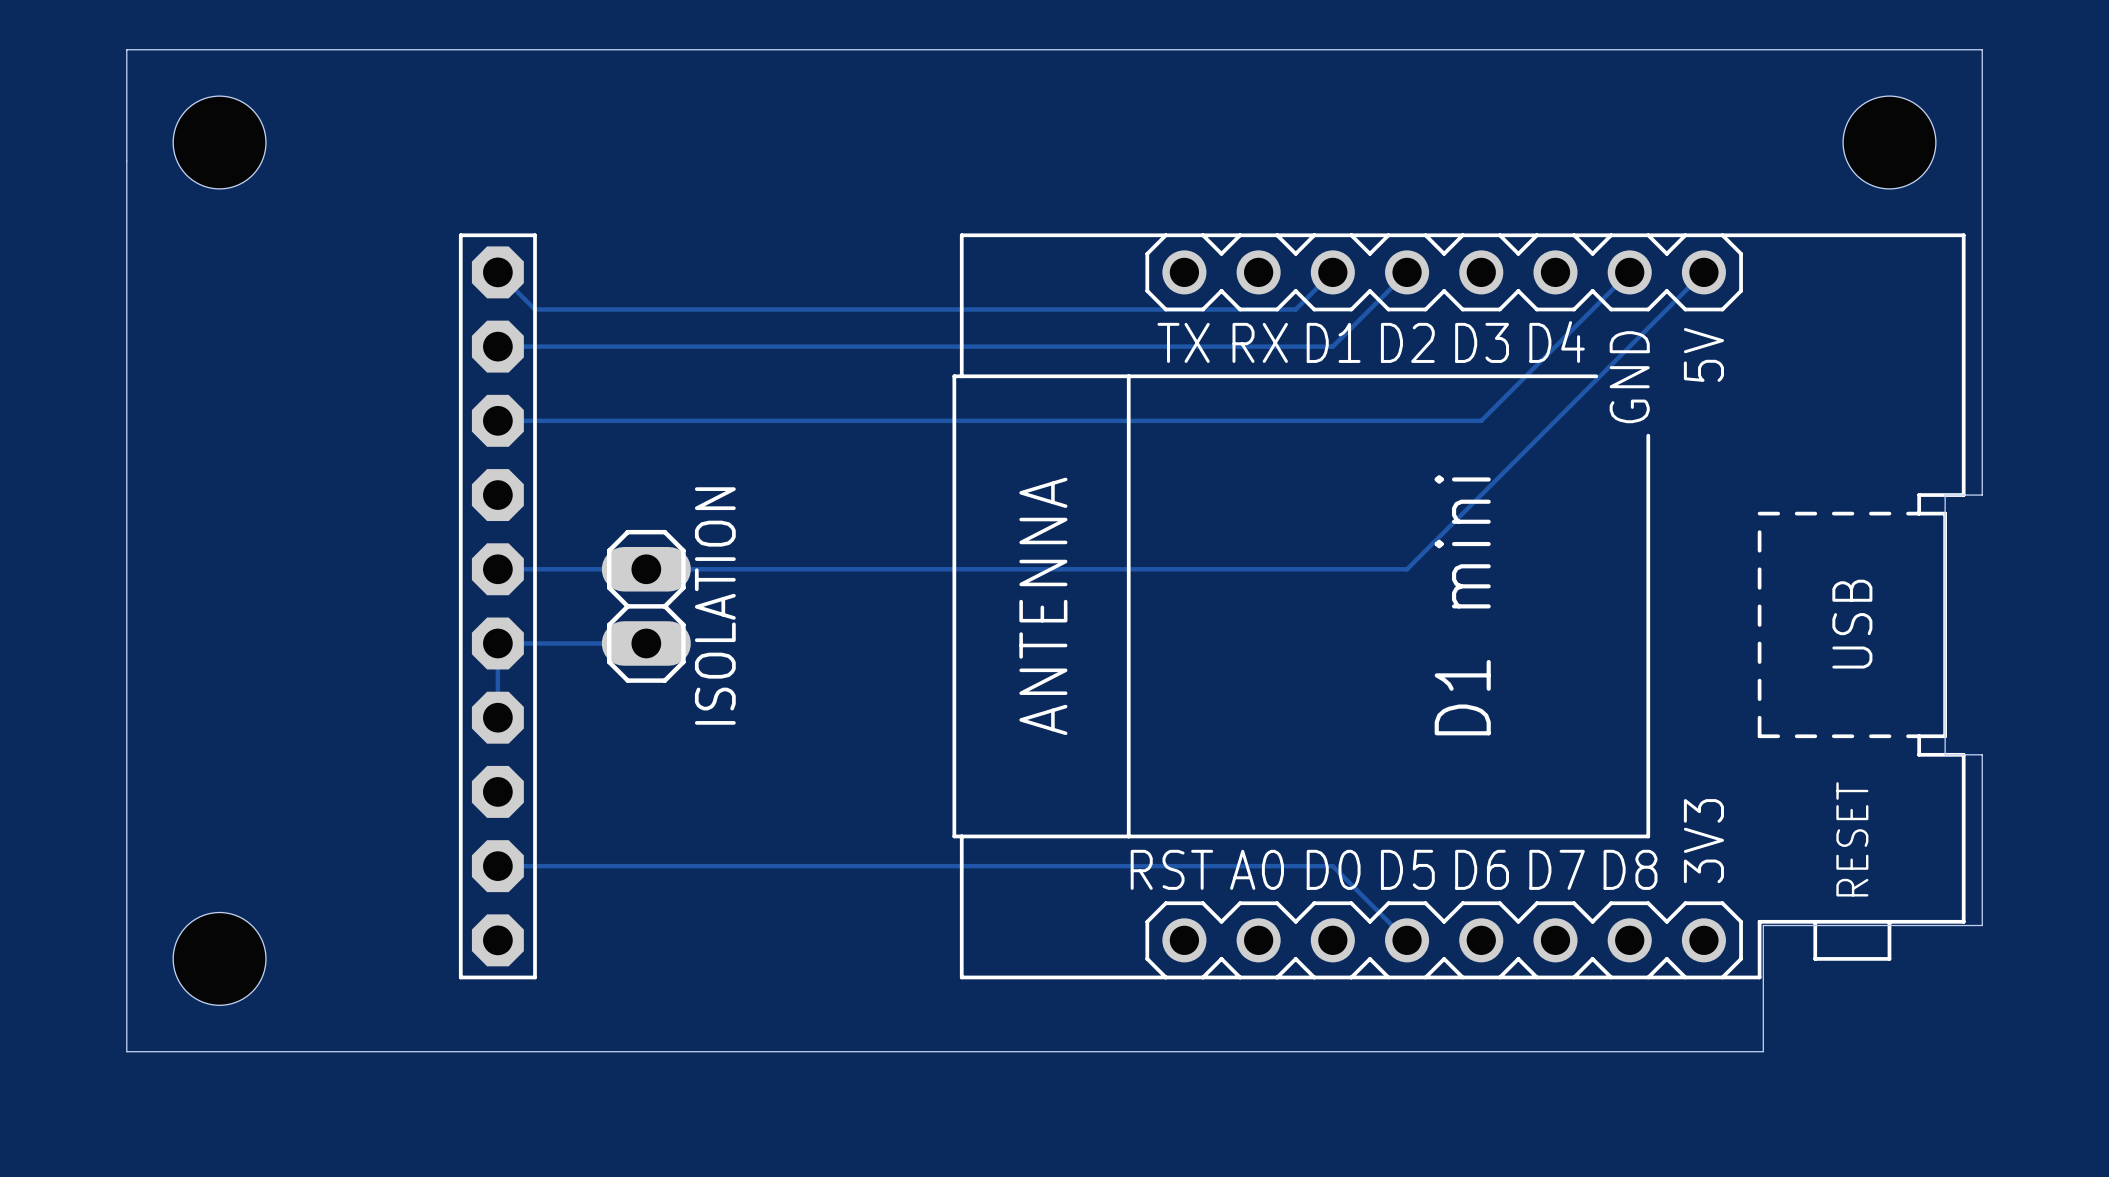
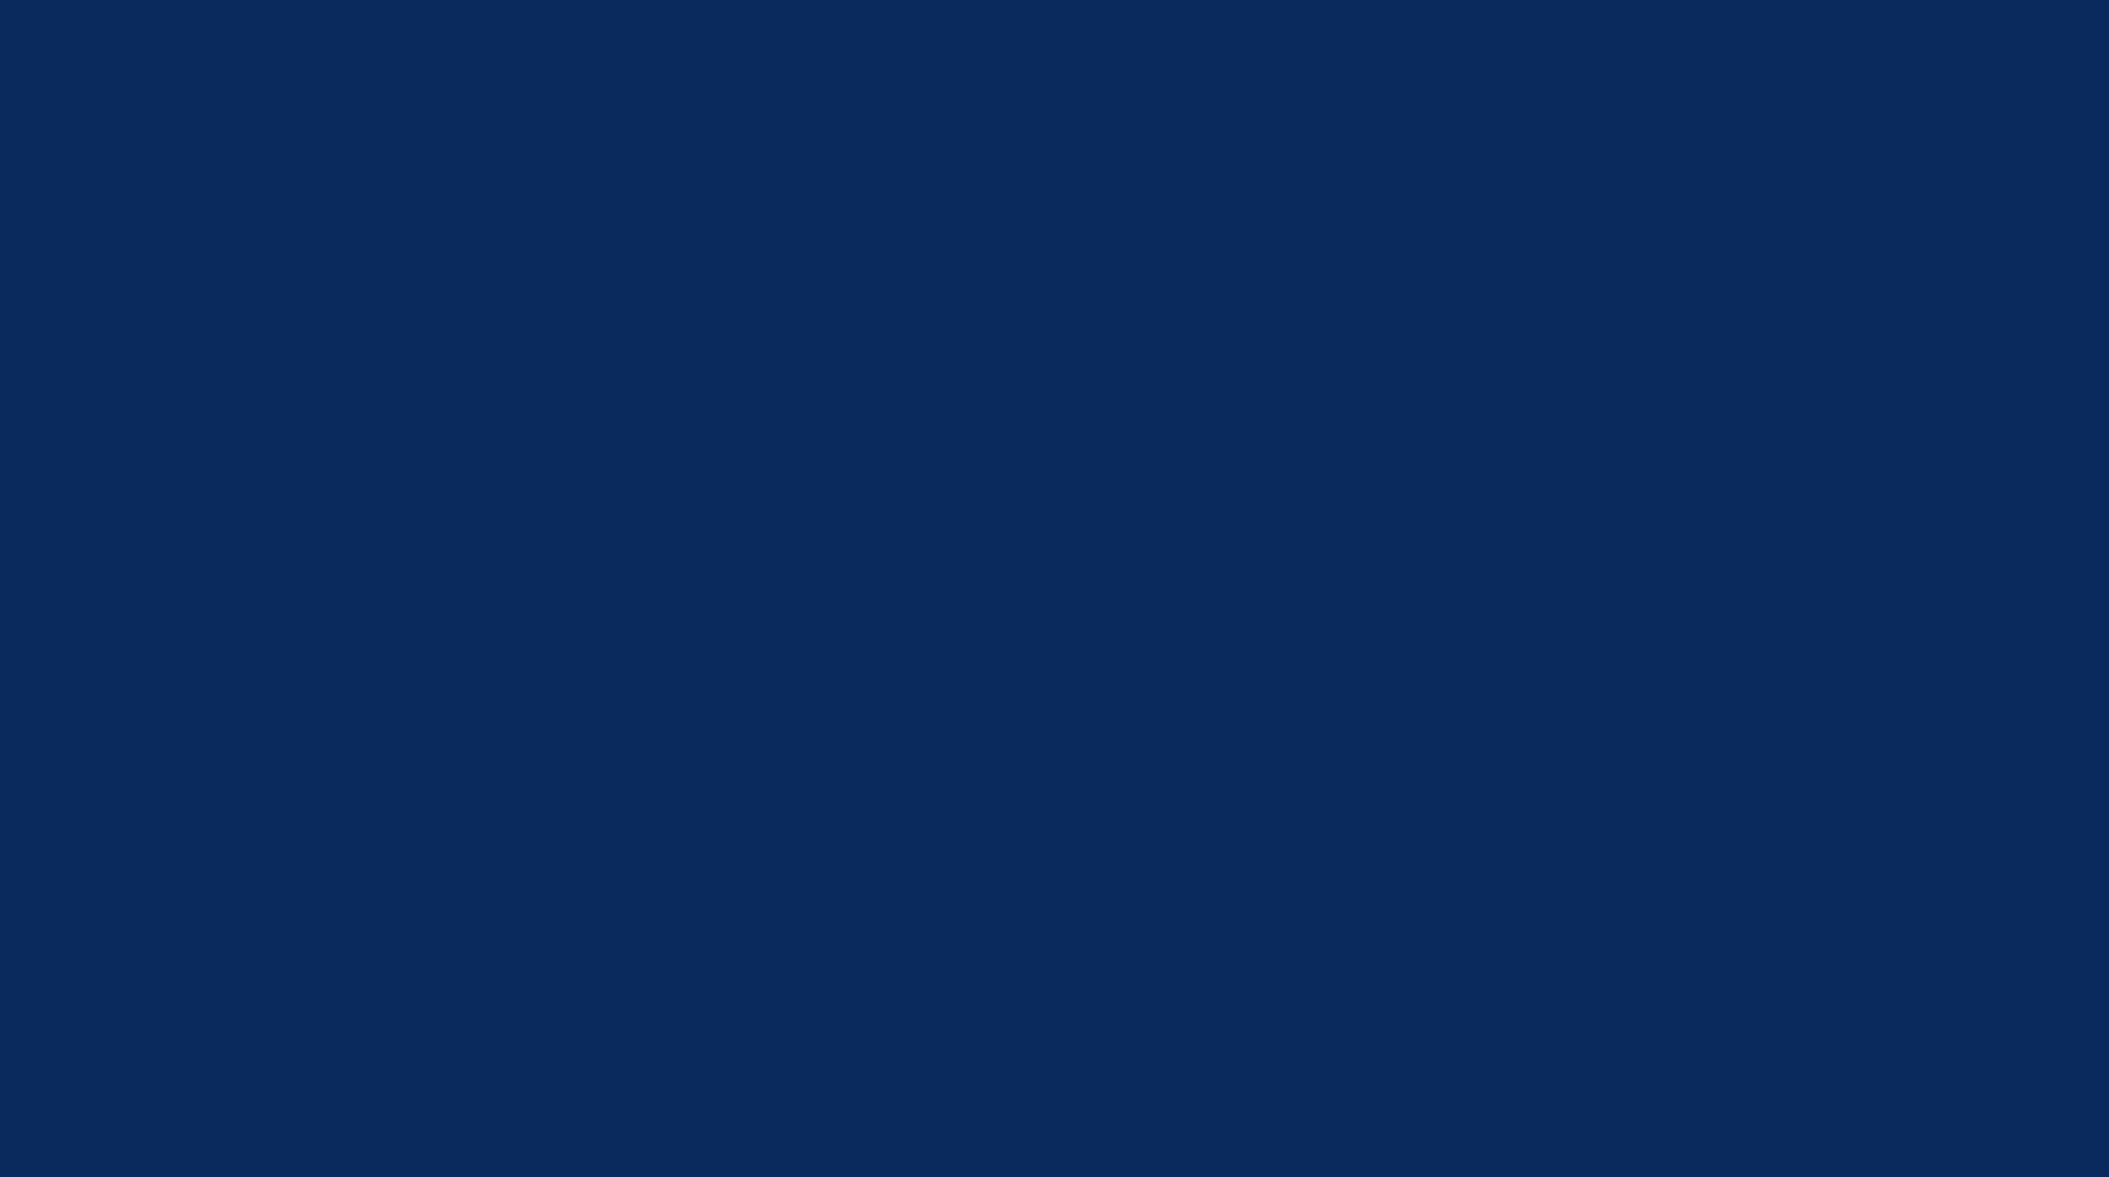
board edge: (126, 49) (126, 1051) (1763, 1051) (1763, 925) (1982, 925) (1982, 754) (1945, 754) (1945, 495) (1982, 495) (1982, 49) (126, 49) -> none
hole: (219, 142) -> none
hole: (1889, 142) -> none
track: (497, 272) (535, 309) (1295, 309) (1332, 272) -> none
track: (1407, 272) (1332, 346) (497, 346) -> none
track: (1629, 272) (1481, 420) (497, 420) -> none
track: (1703, 272) (1407, 569) (497, 569) -> none
part: (497, 606) -> none
ISOLATION: (646, 606) -> none
part: (1459, 606) -> none
track: (646, 643) (497, 643) (497, 717) -> none
track: (497, 866) (1332, 866) (1407, 940) -> none
hole: (219, 958) -> none

